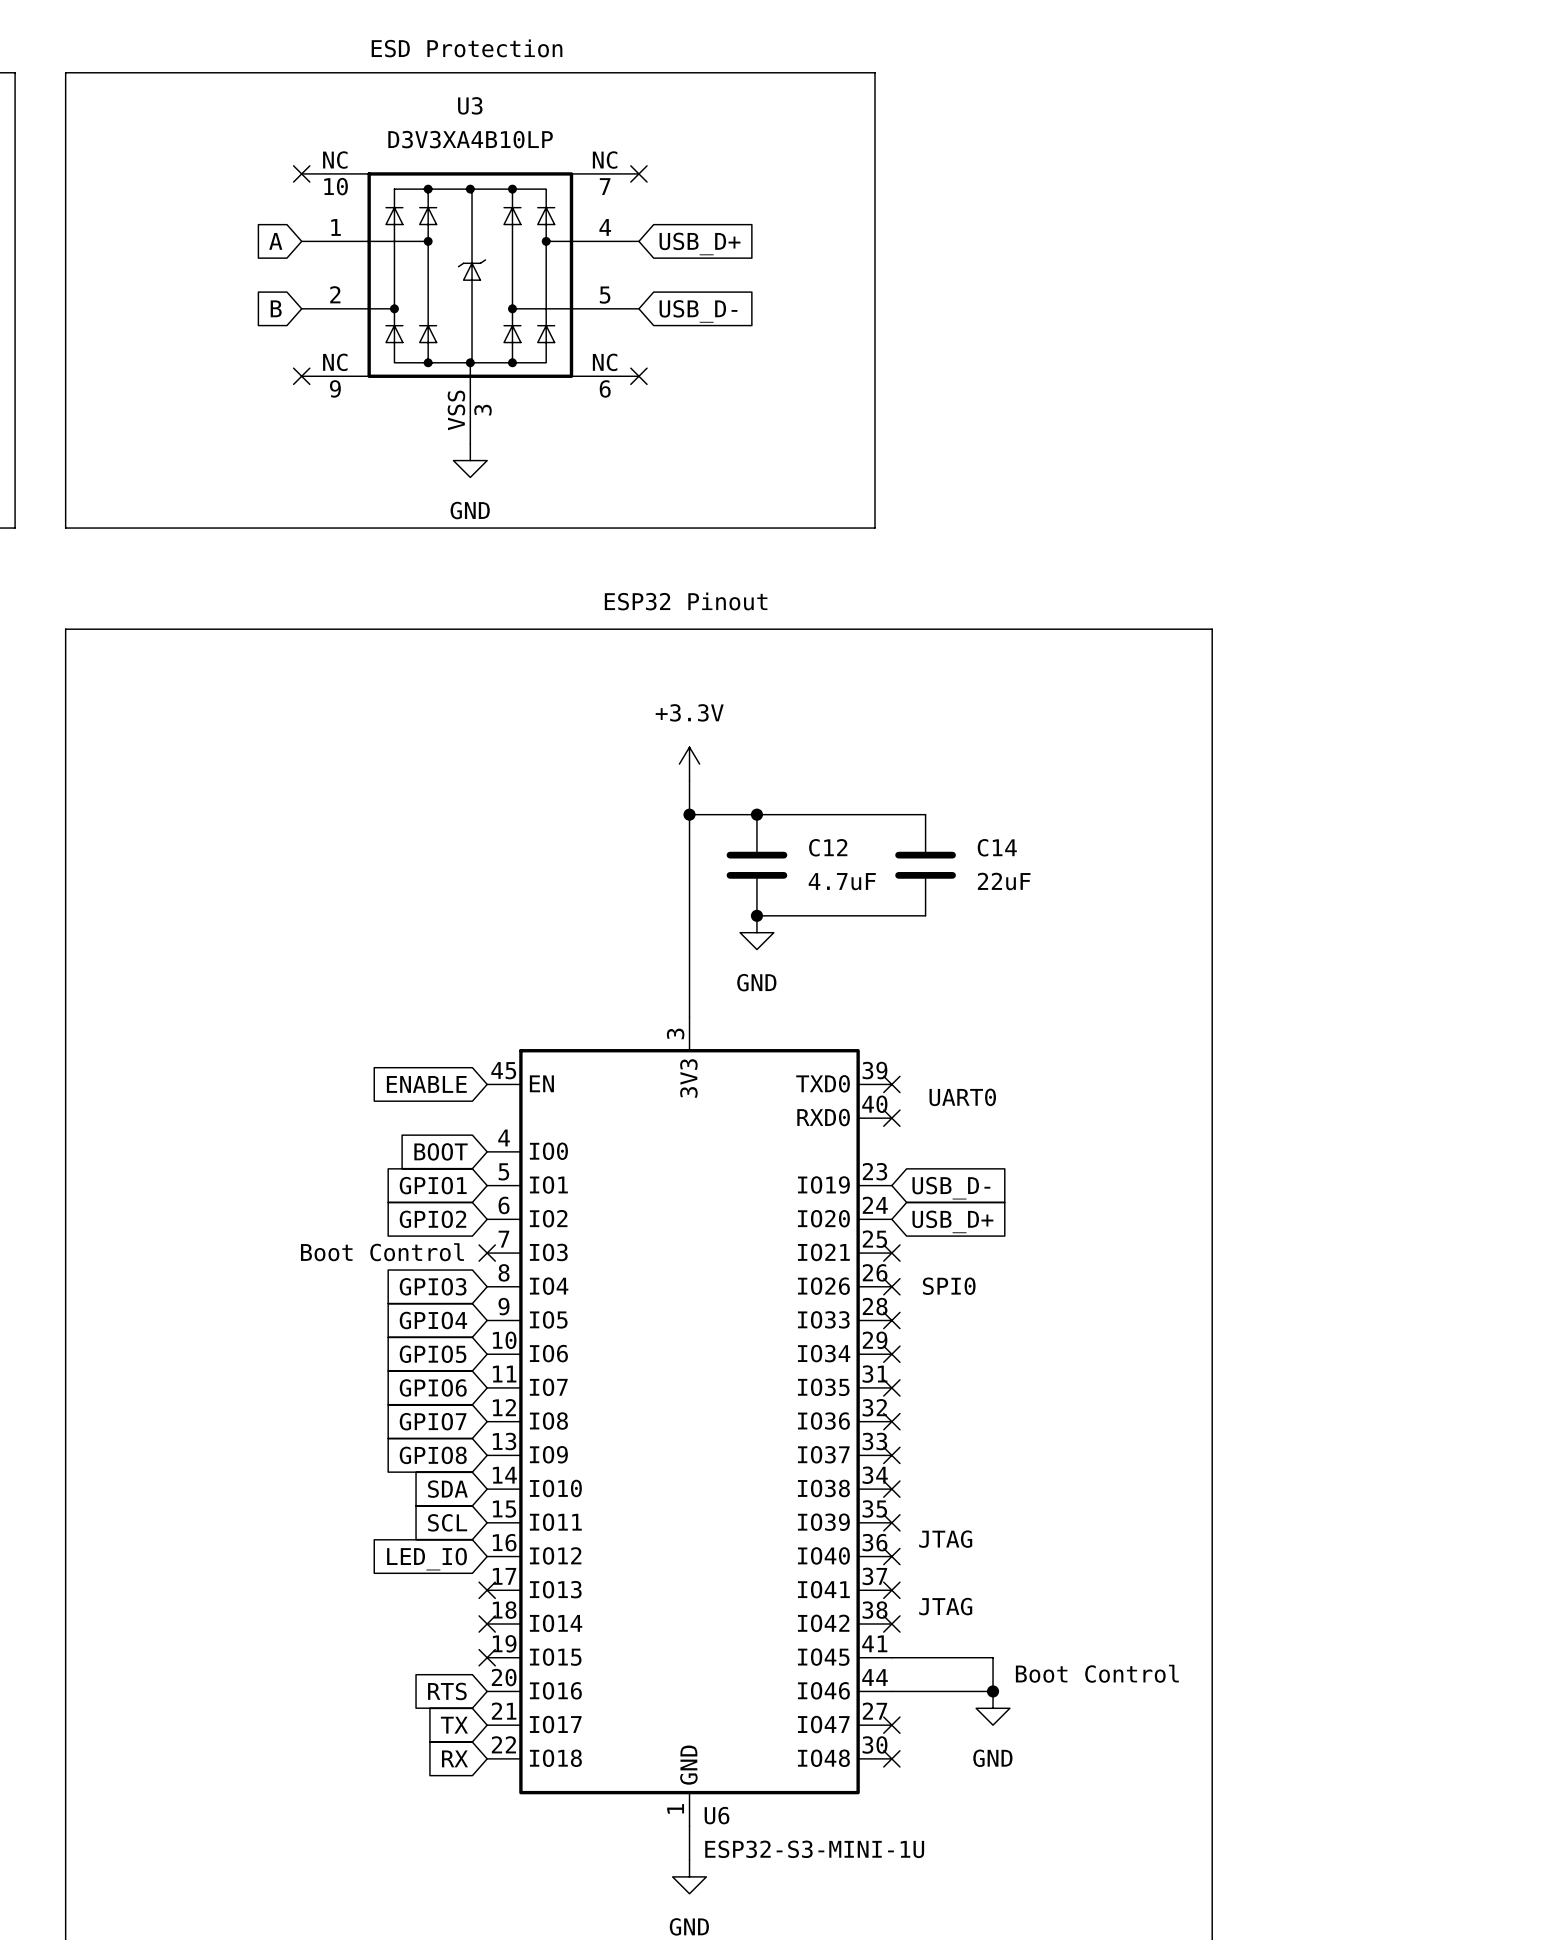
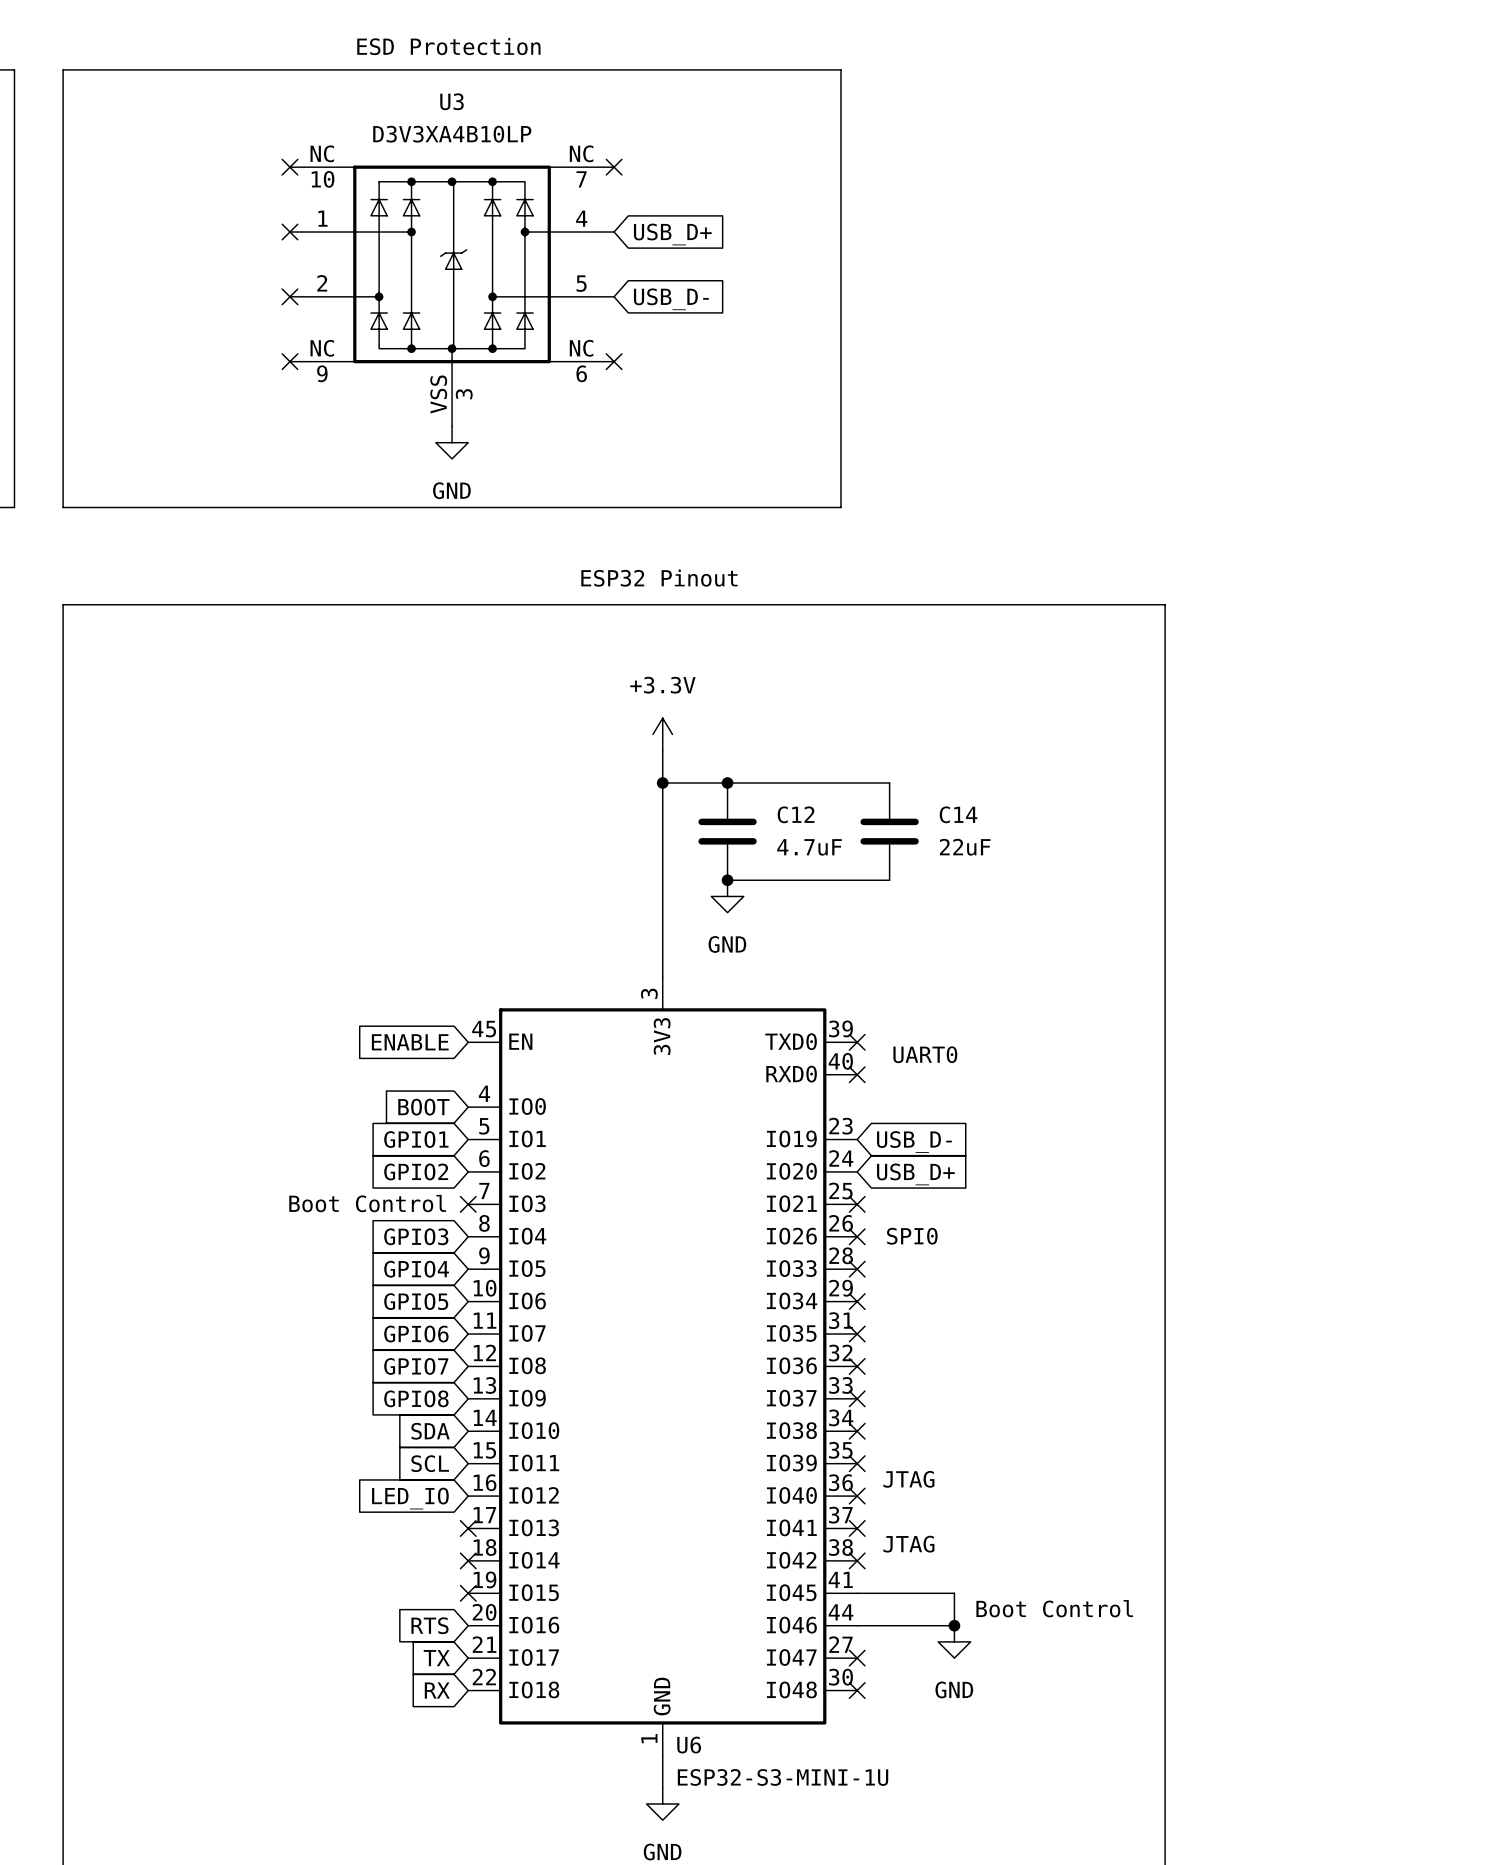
global label: A (275, 241) -> none
no-connect mark: none -> (289, 232)
global label: B (276, 308) -> none
no-connect mark: none -> (289, 296)

